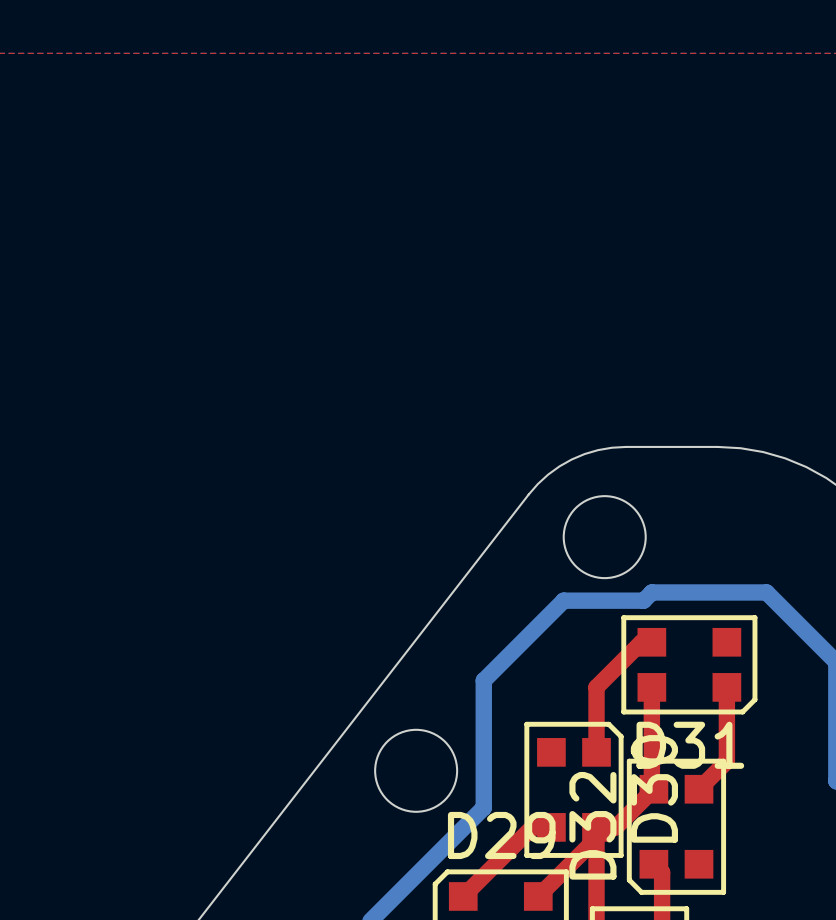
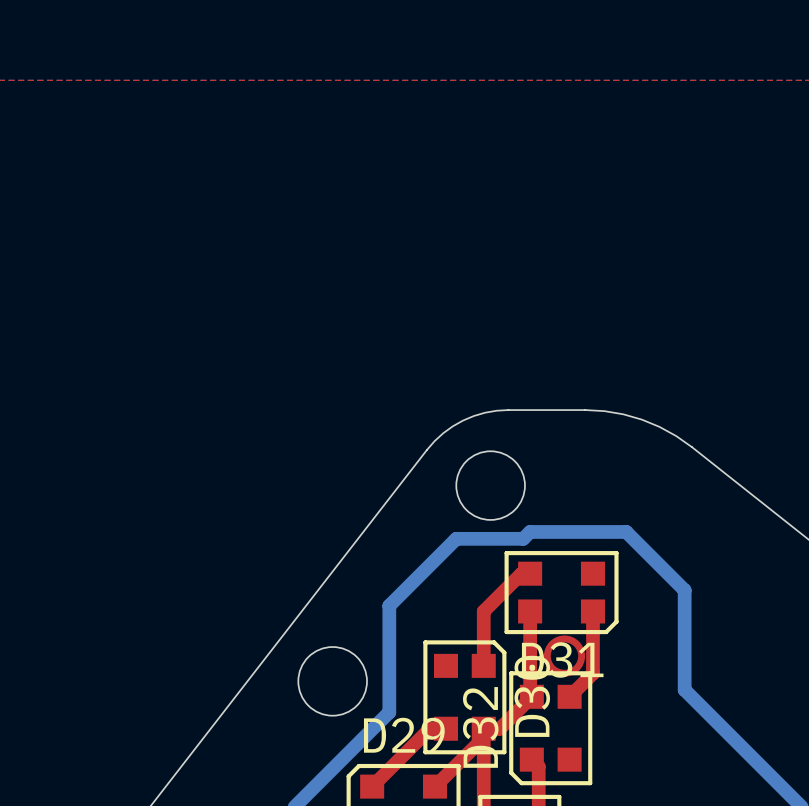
drawing: none -> [543, 635, 586, 677]

